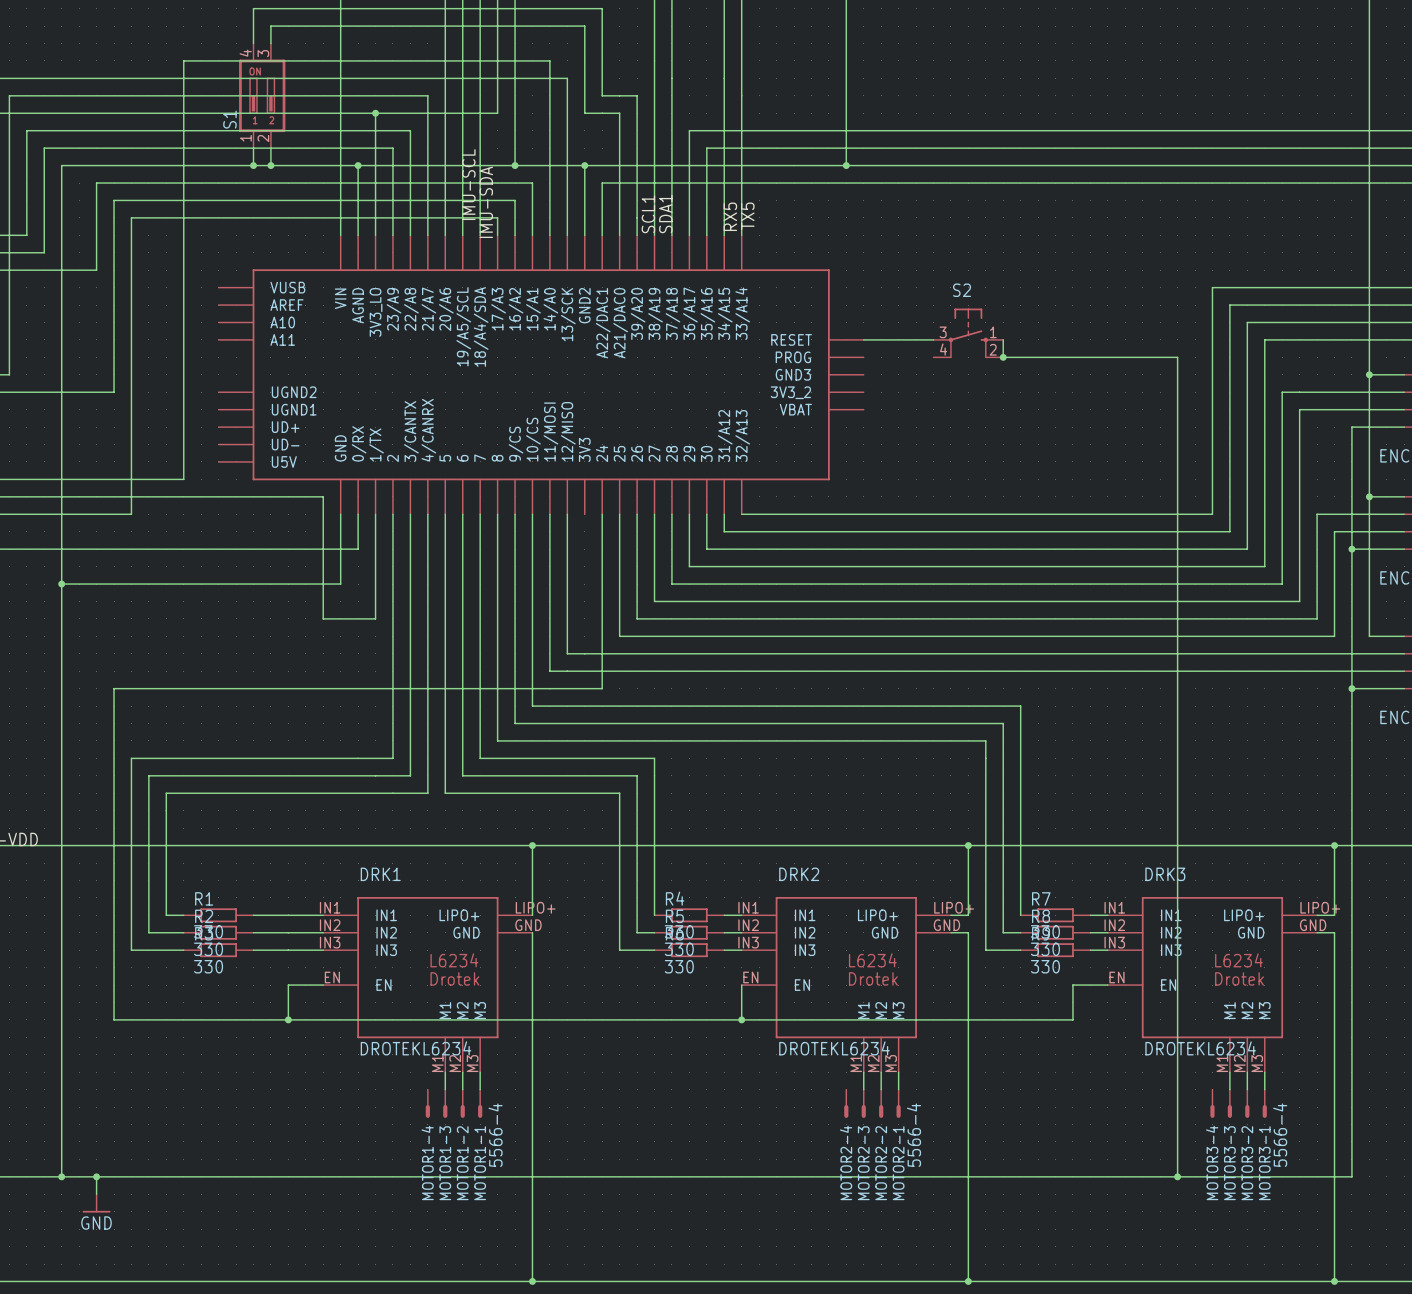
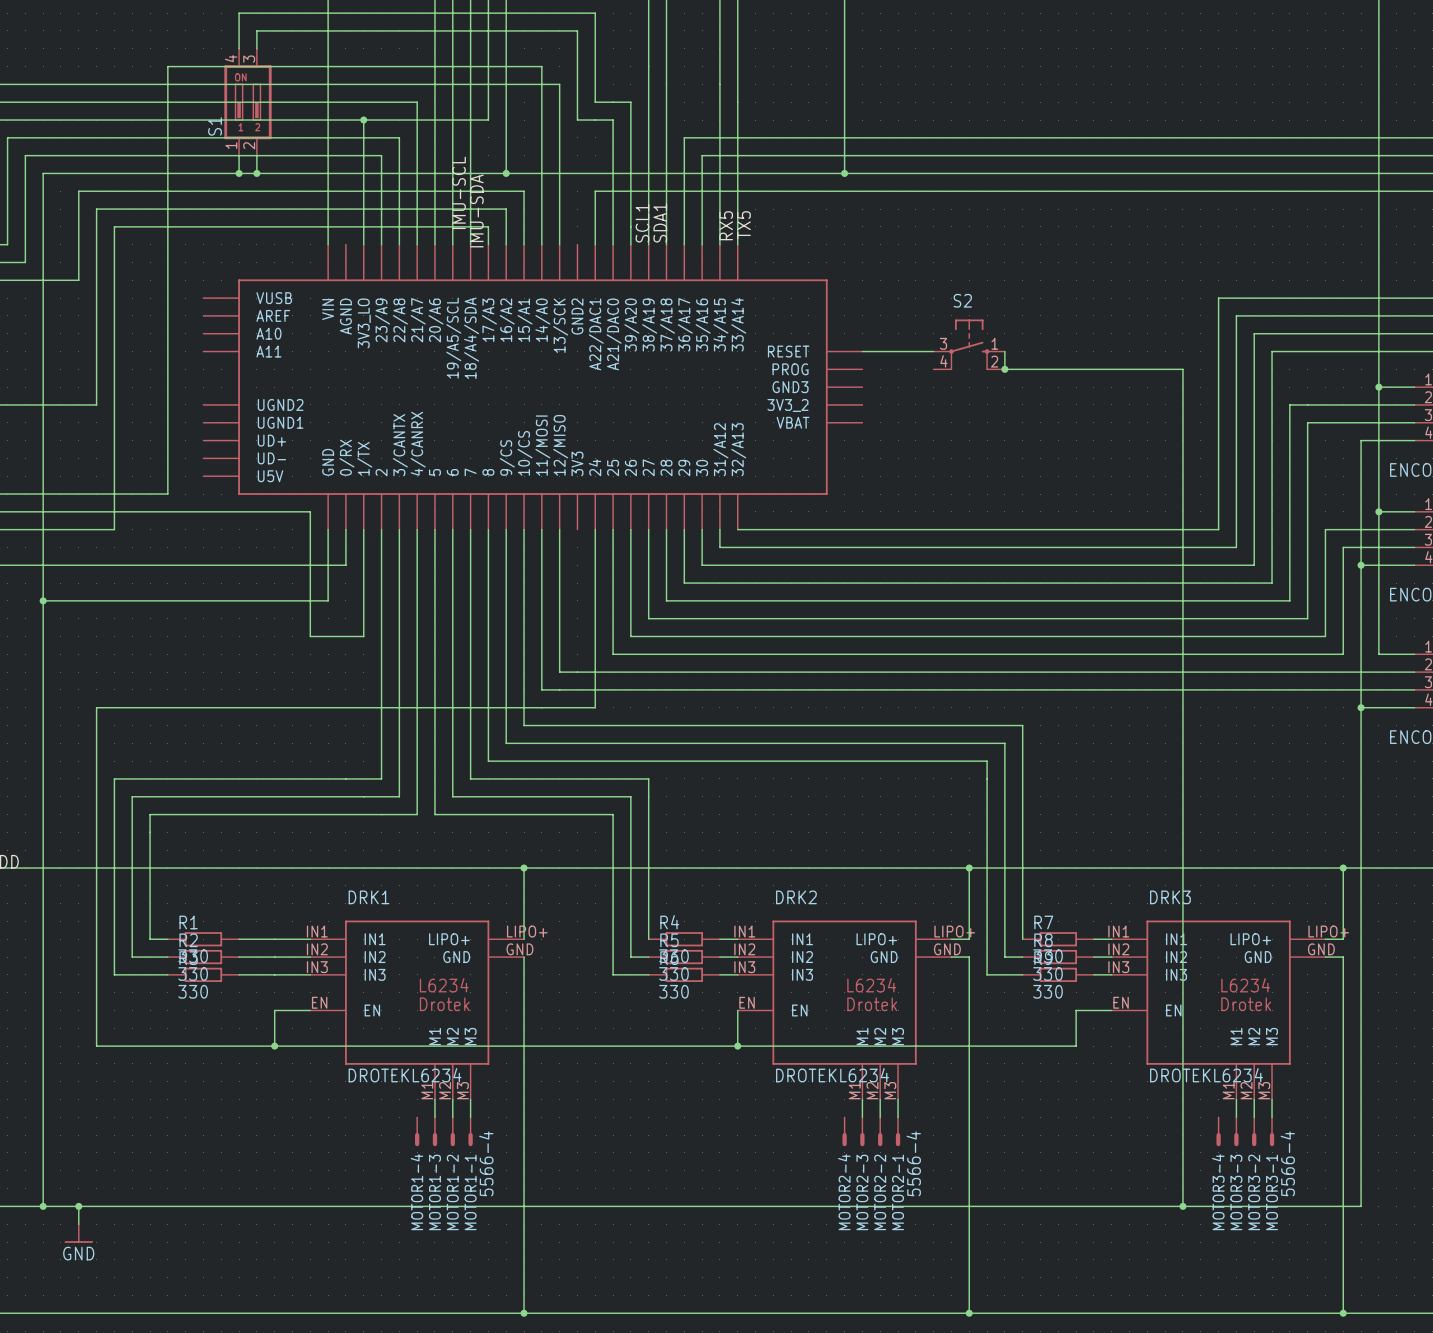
wire: (358, 165) (358, 235) -> none
junction: (358, 165) -> none
wire: (584, 165) (584, 235) -> none
junction: (584, 165) -> none

